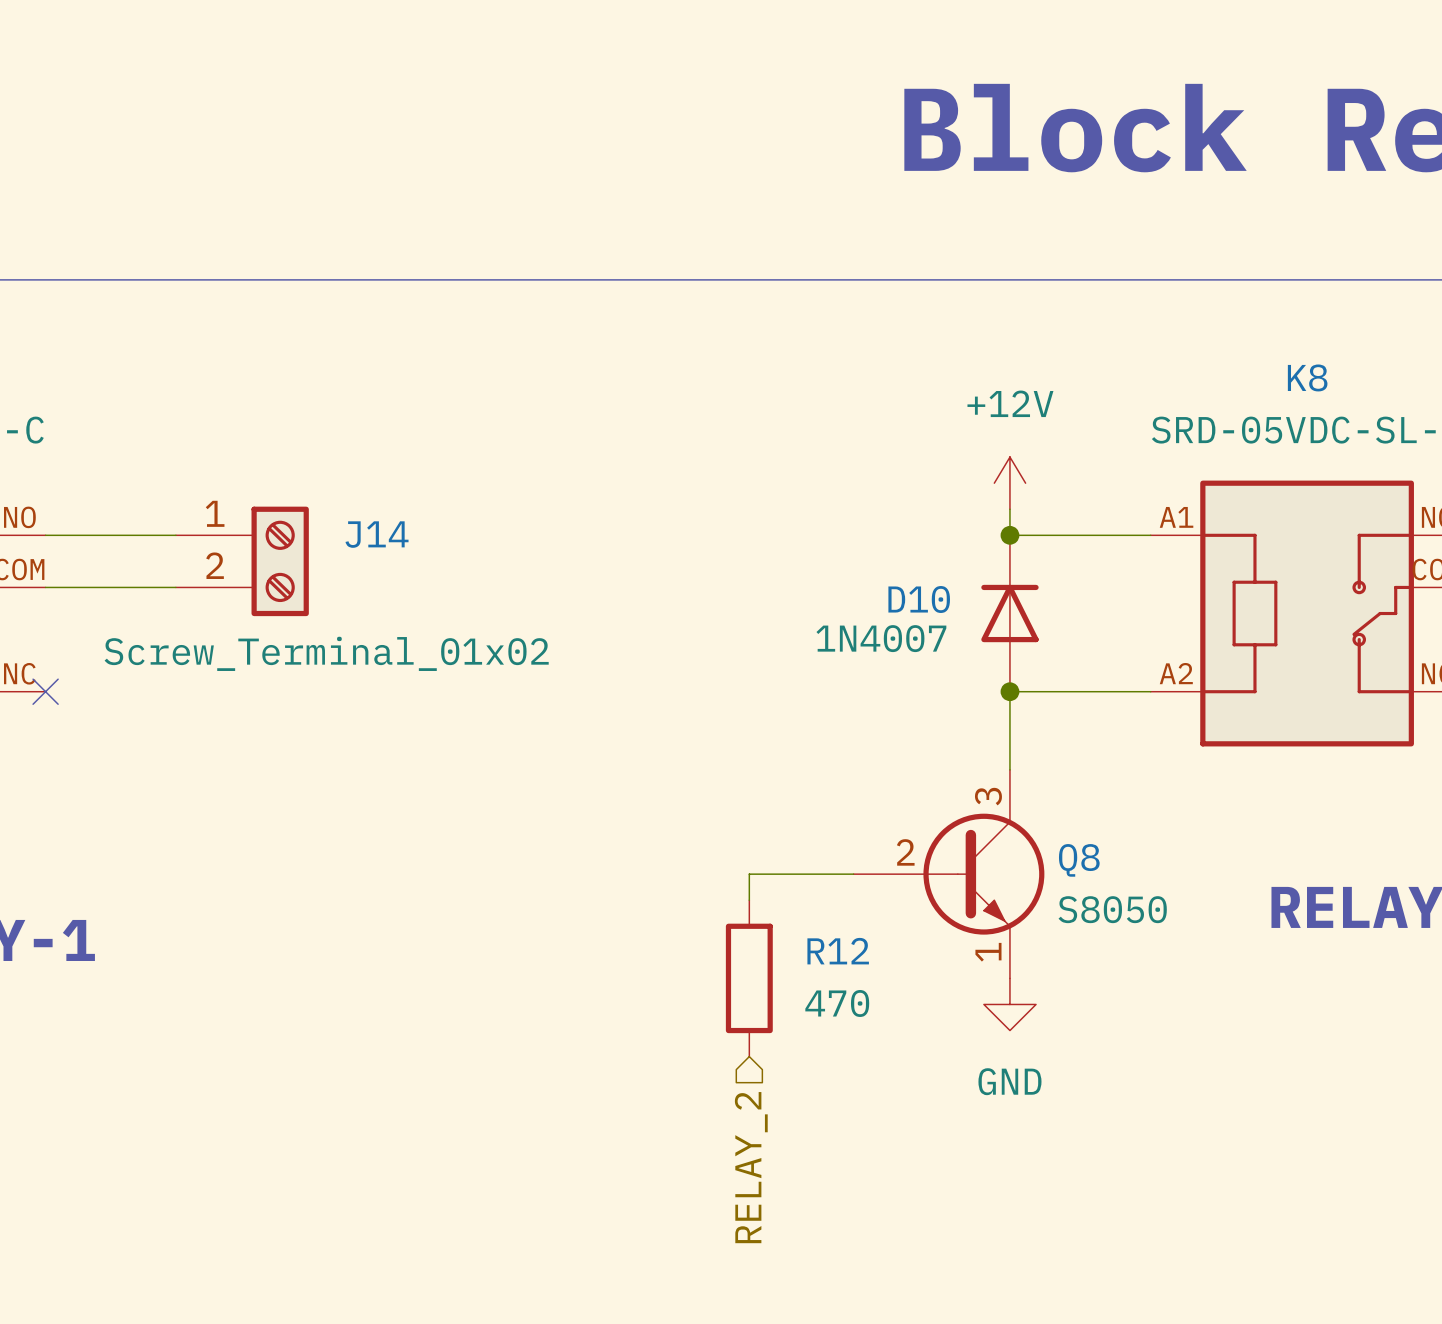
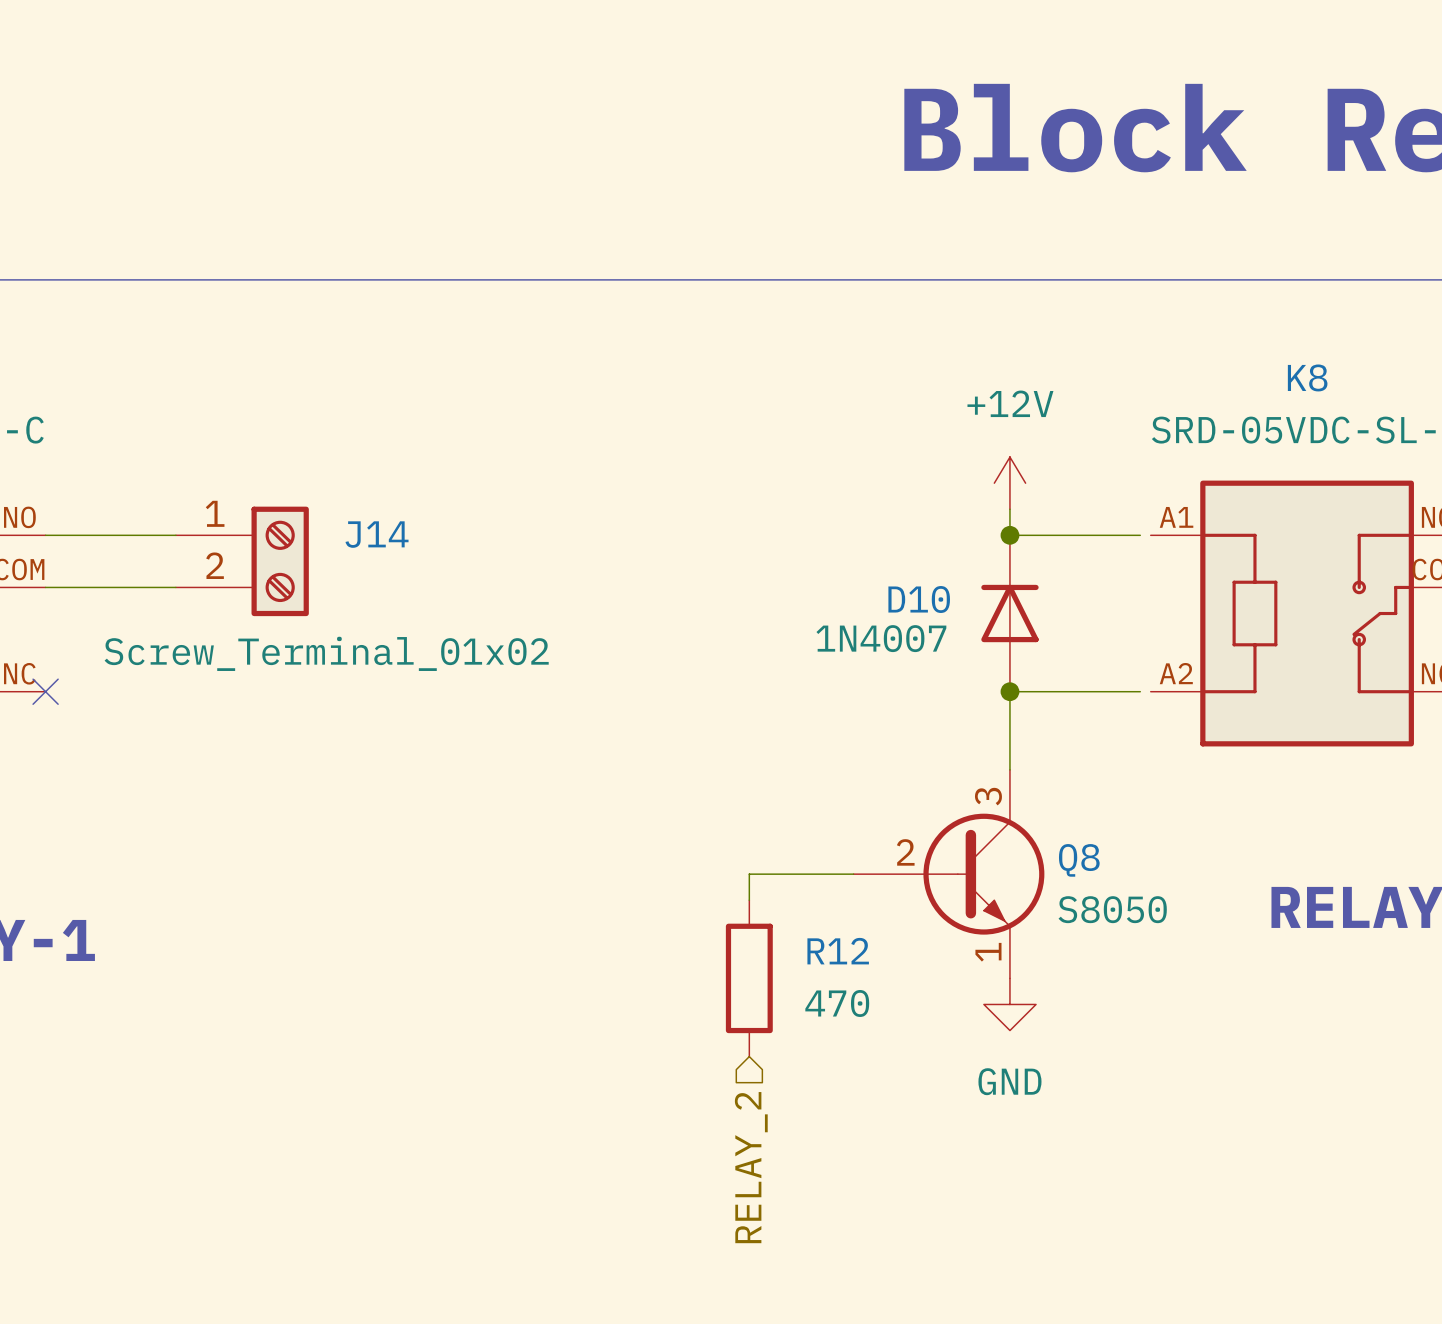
wire: (1140, 535) (1150, 535) -> none
wire: (1140, 691) (1150, 691) -> none

